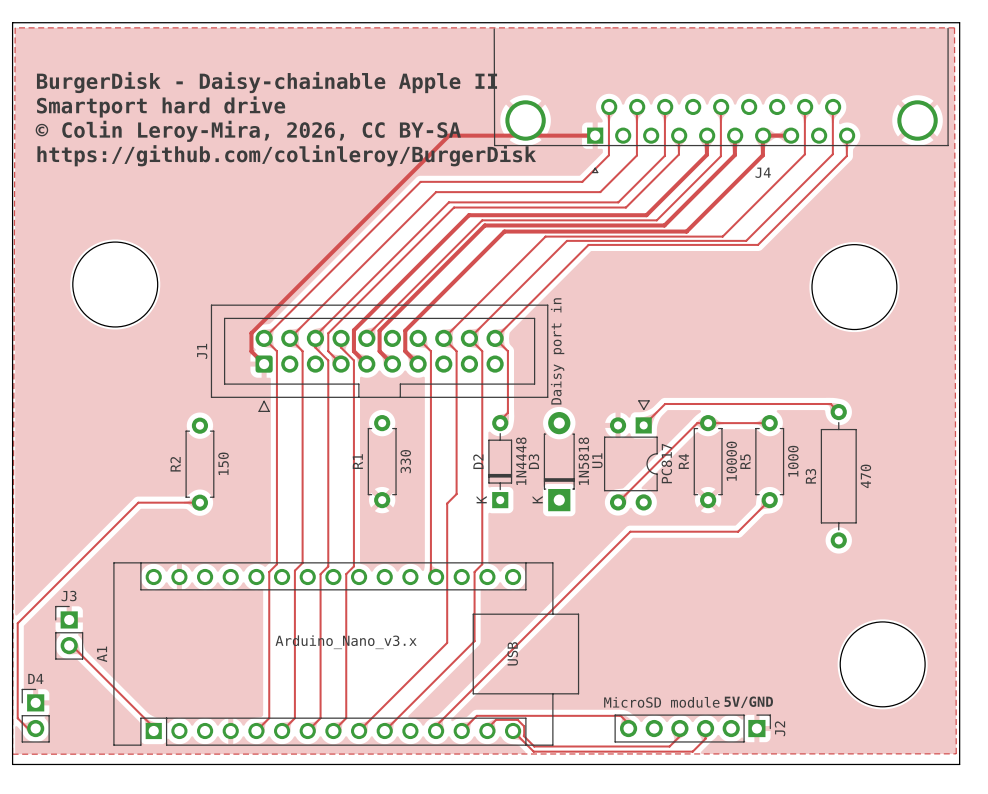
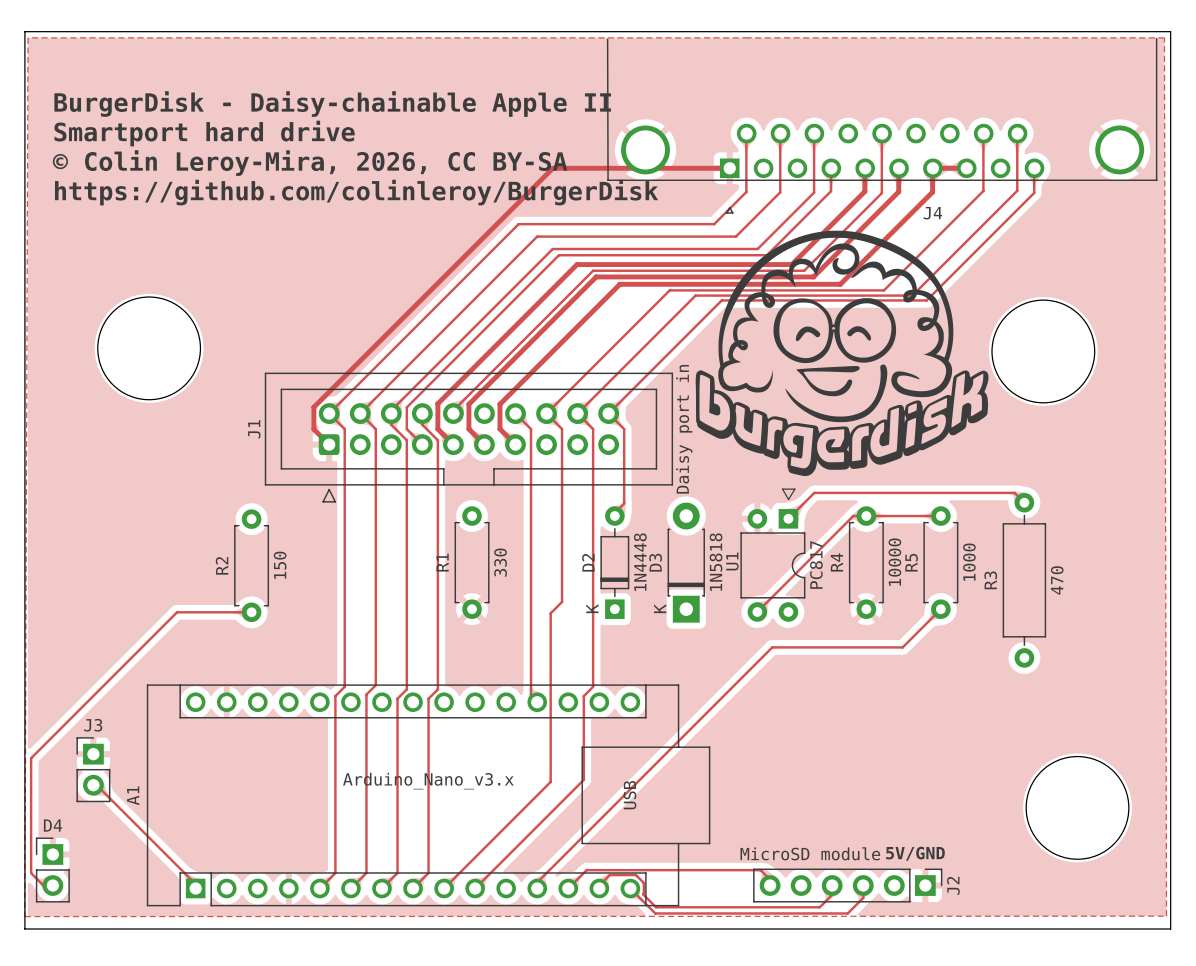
drawing: none -> [695, 230, 989, 477]

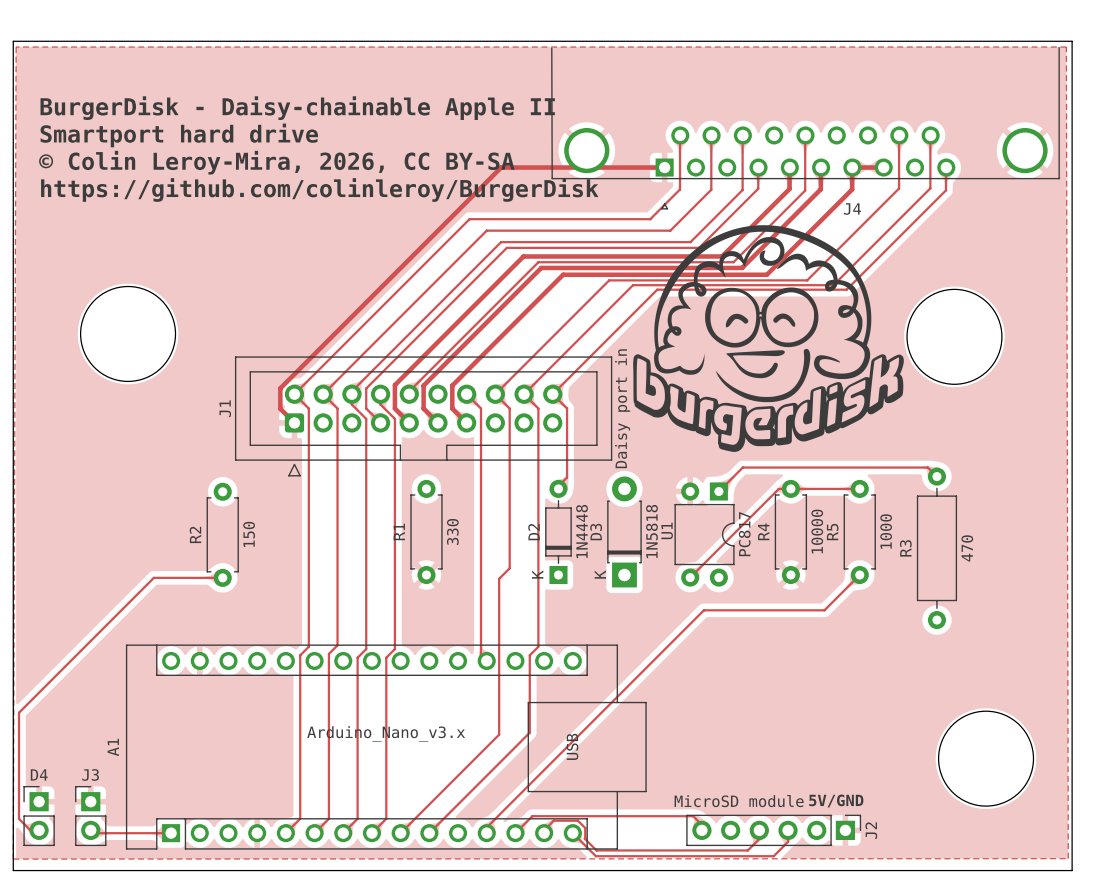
U1 footprint: [740, 488, 806, 622] -> [674, 482, 735, 587]
J3 position: (93, 769) -> (90, 816)
track: (93, 785) (96, 785) (195, 884) (195, 888) -> (90, 830) (93, 833) (171, 833)

